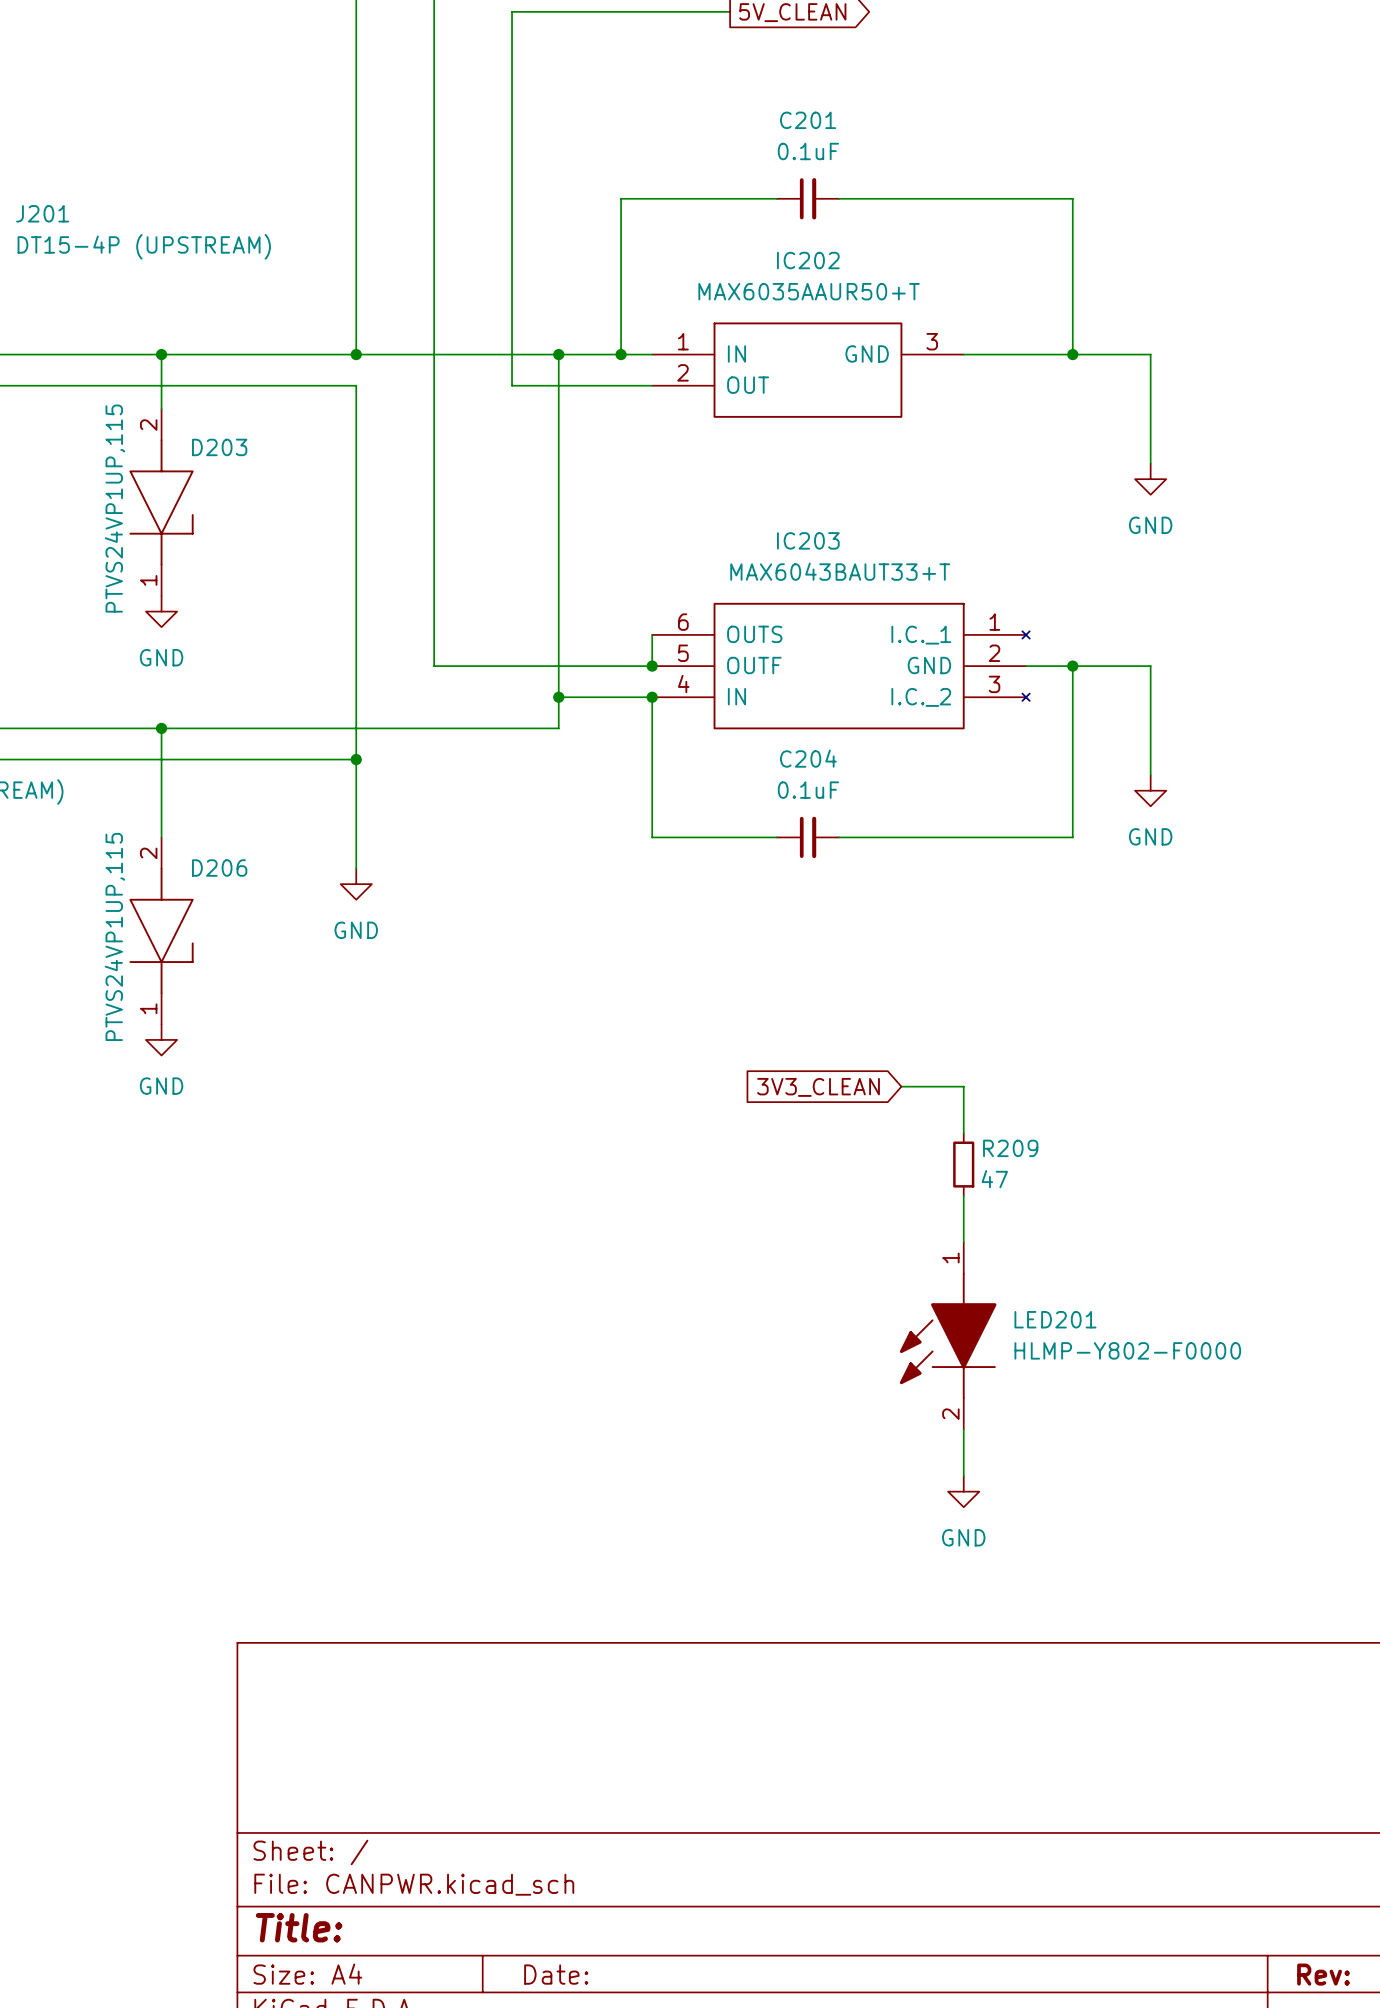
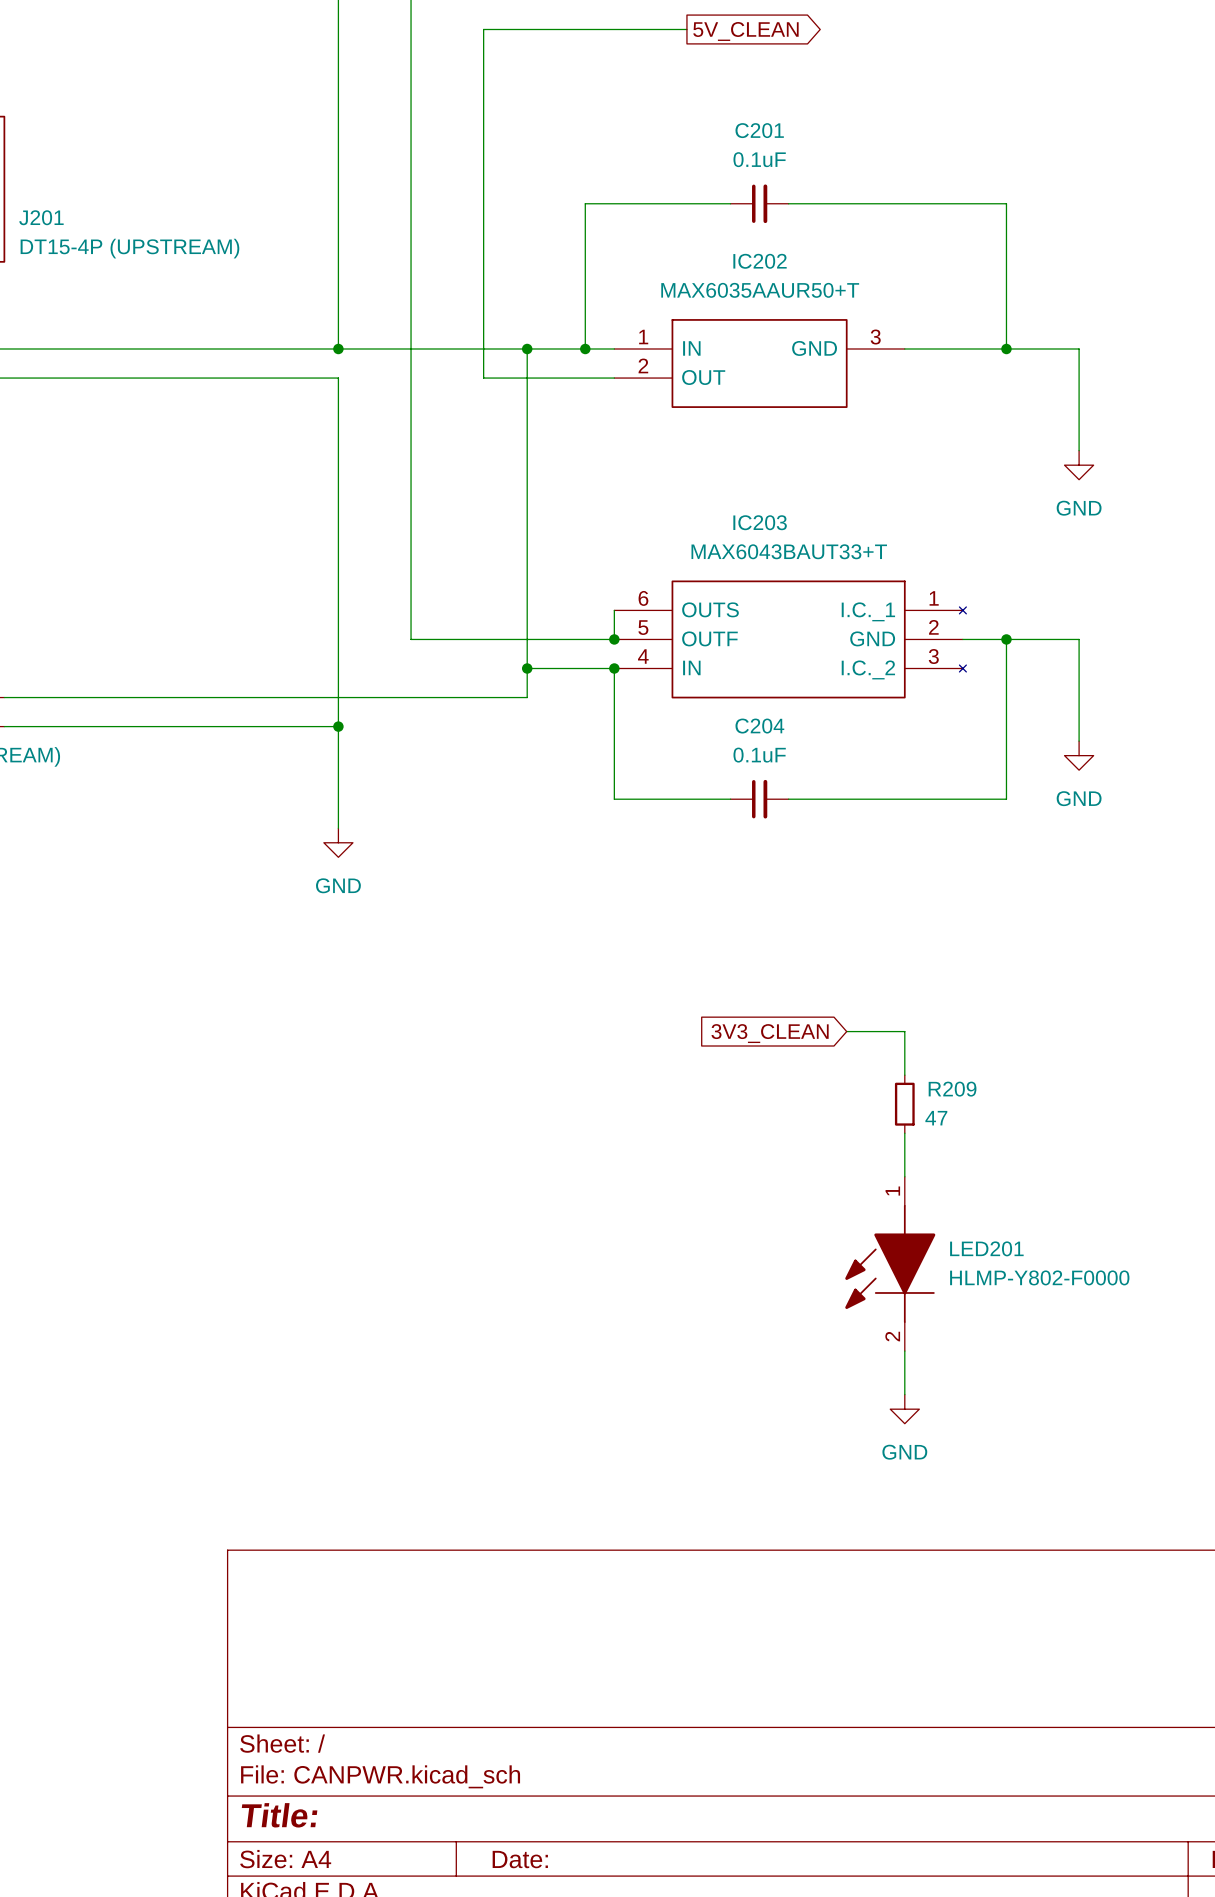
wire: (161, 354) (161, 409) -> none
junction: (161, 354) -> none
D203: PTVS24VP1UP,115 (161, 502) -> none
power symbol: GND (161, 611) -> none
wire: (161, 728) (161, 837) -> none
junction: (161, 728) -> none
D206: PTVS24VP1UP,115 (161, 930) -> none
power symbol: GND (161, 1039) -> none

